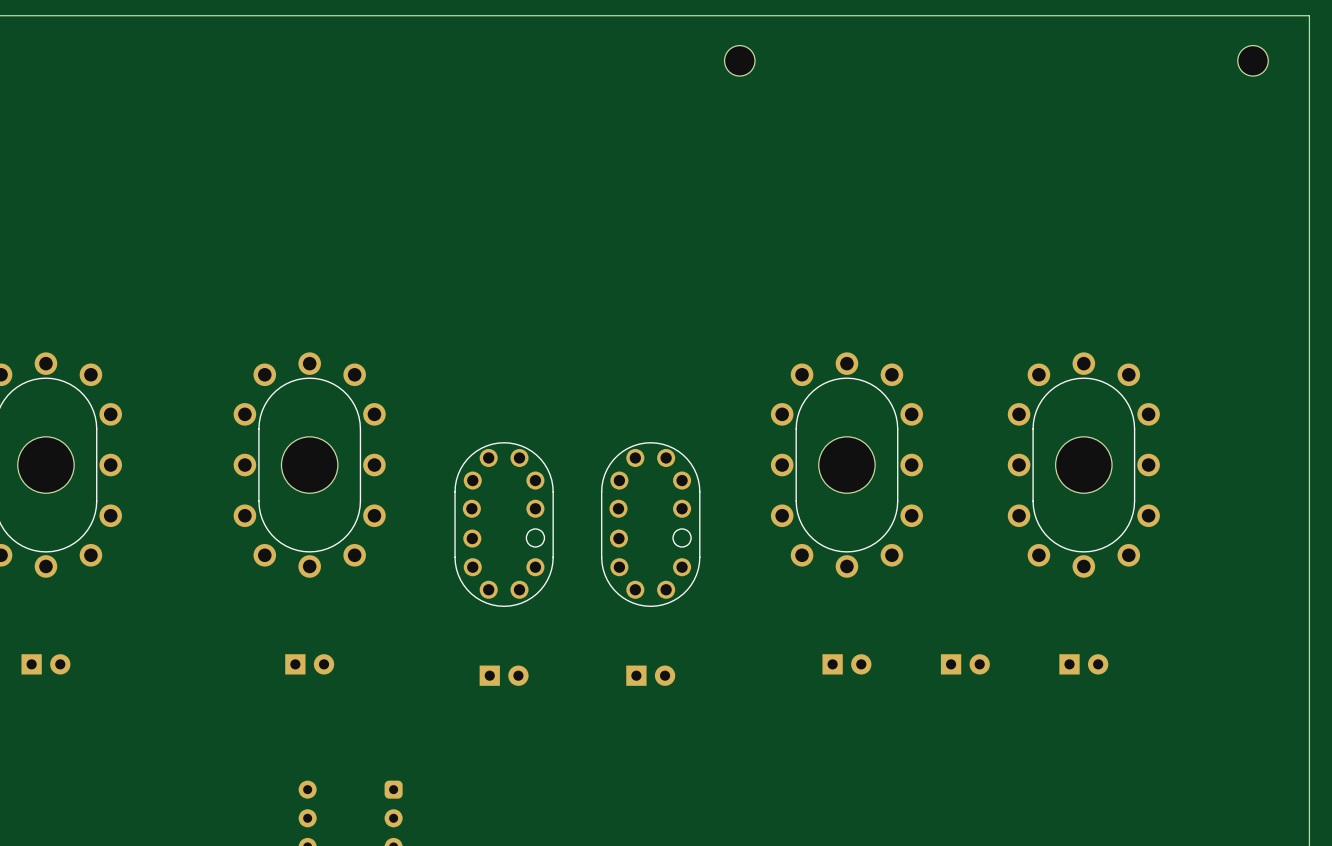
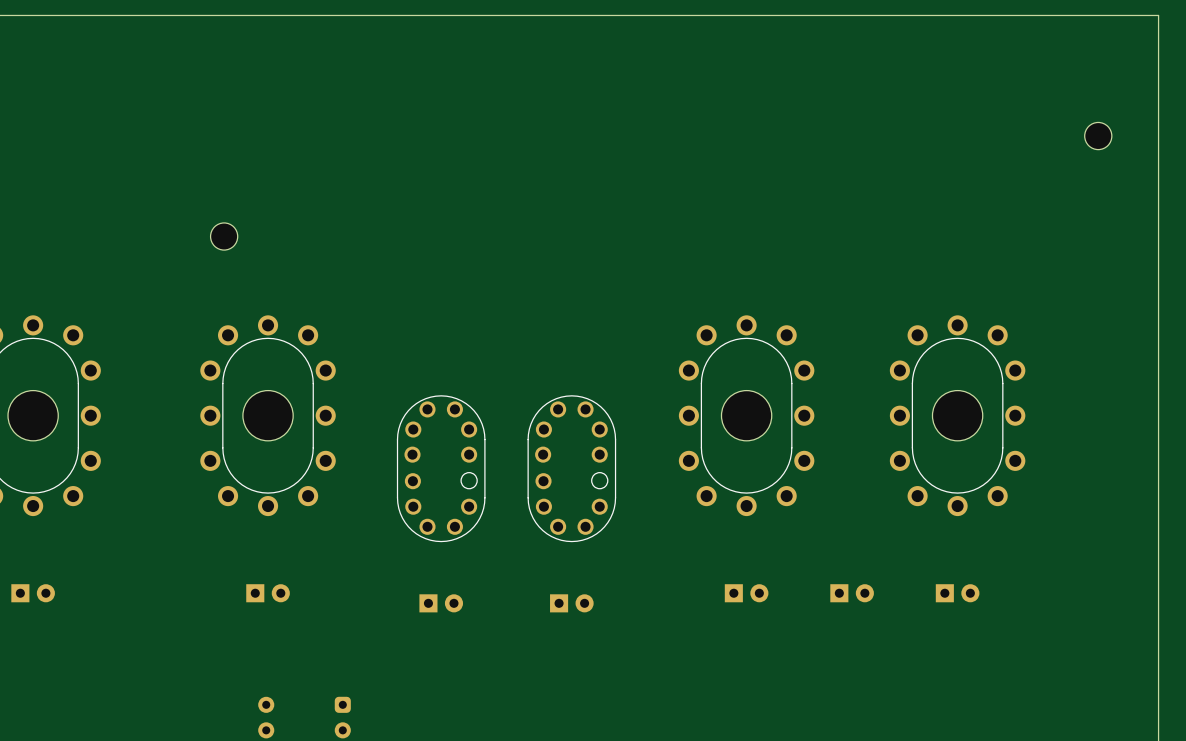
part: (739, 60) -> none
part position: (1253, 60) -> (1098, 136)
part: none -> (224, 236)

